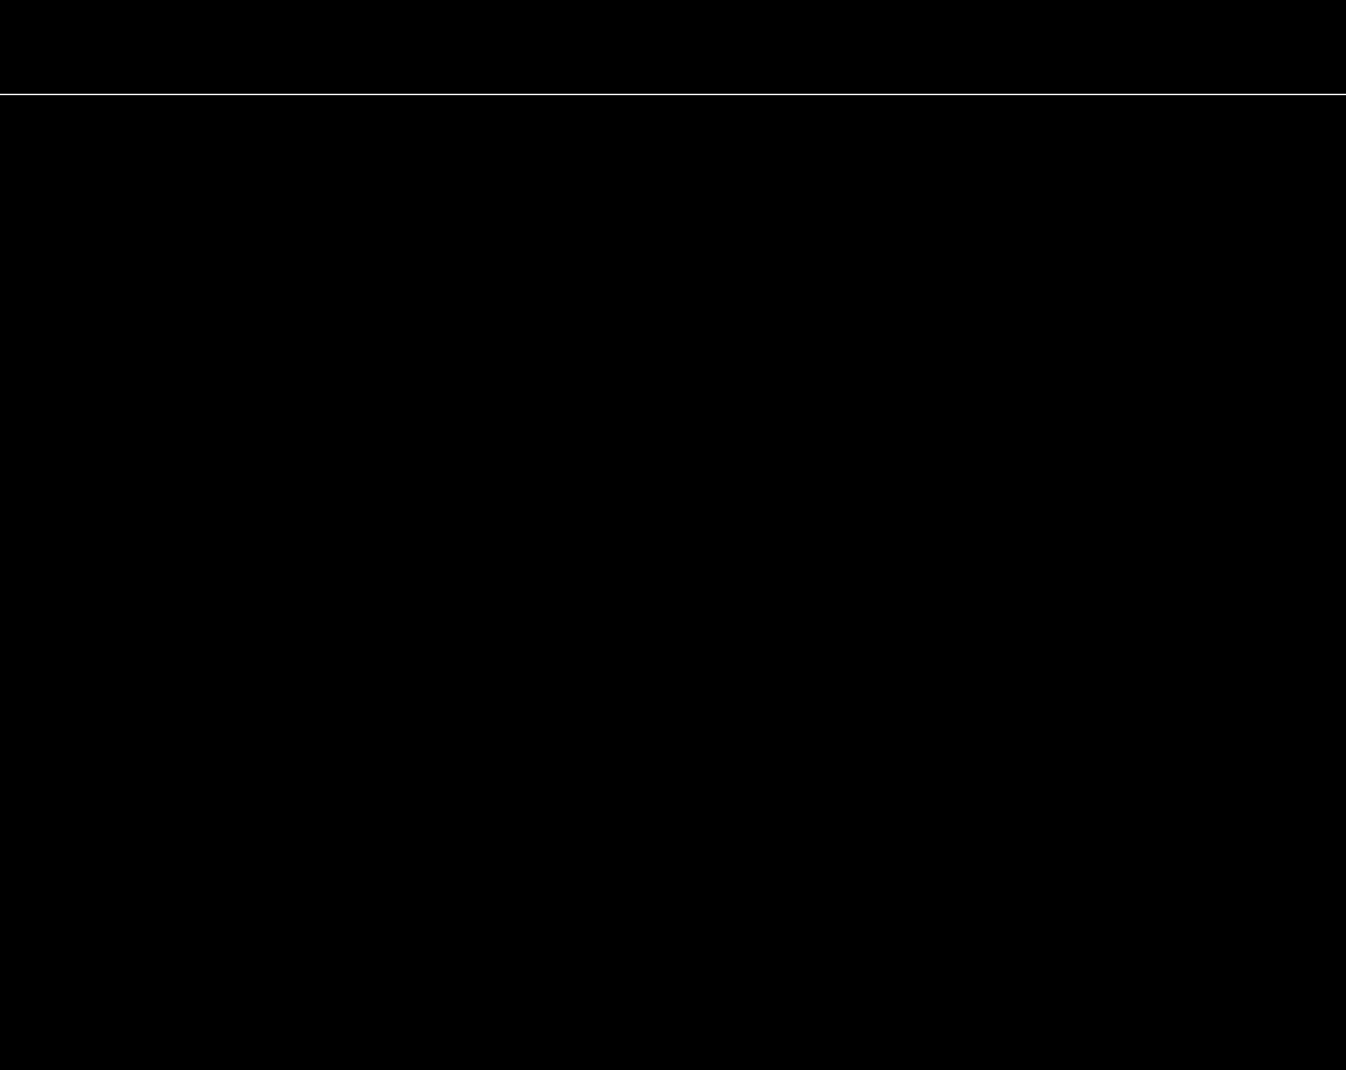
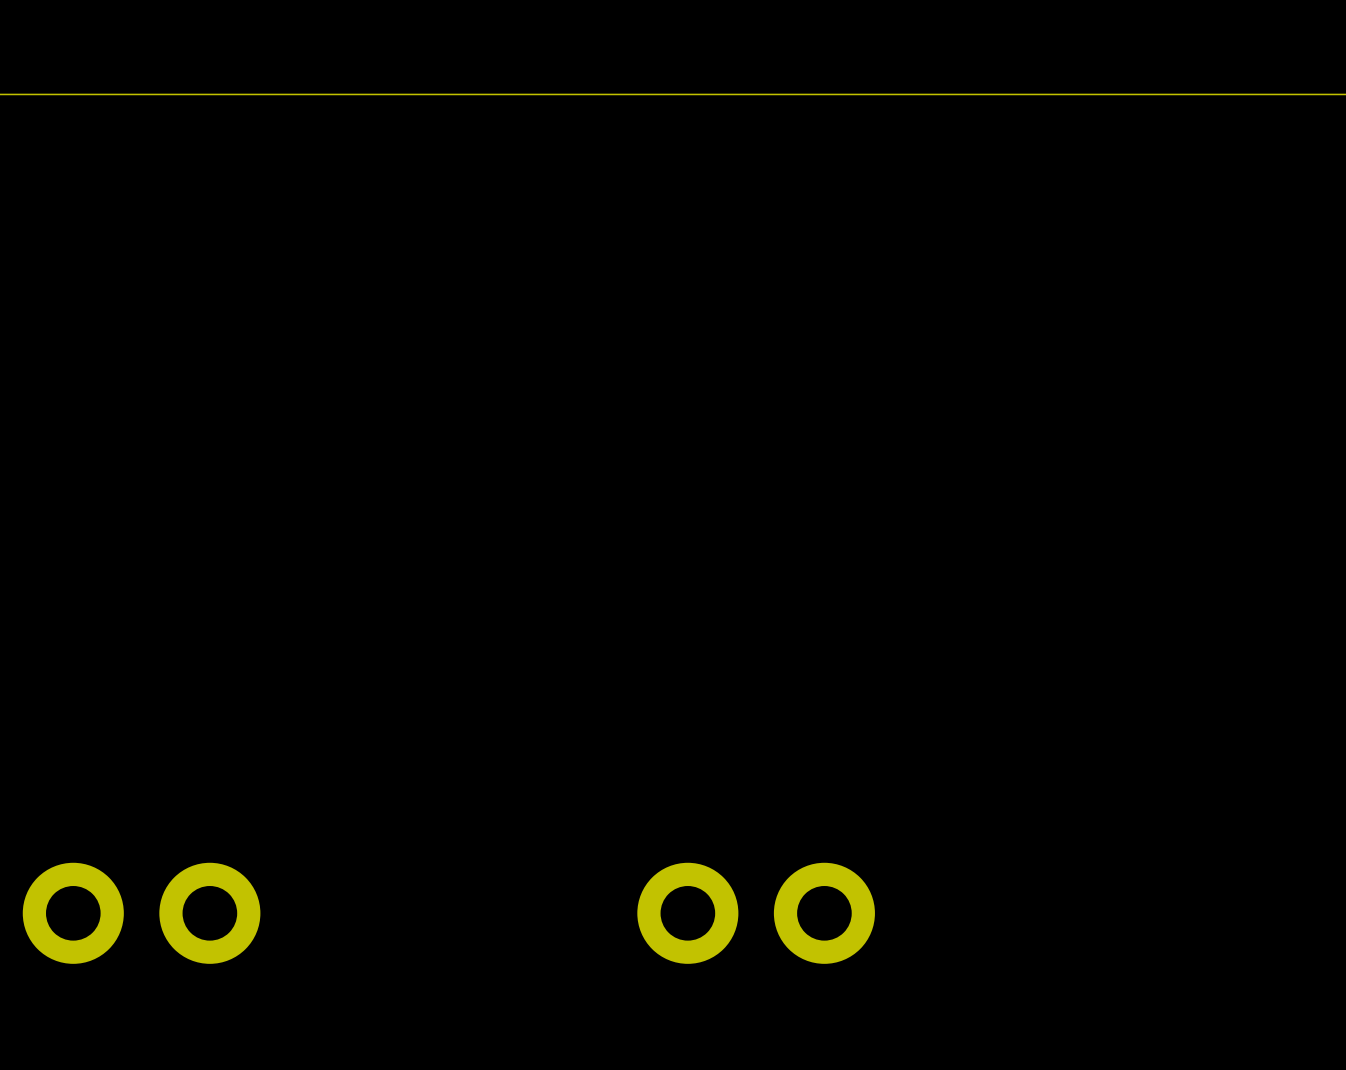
part: none -> (141, 913)
part: none -> (756, 913)

